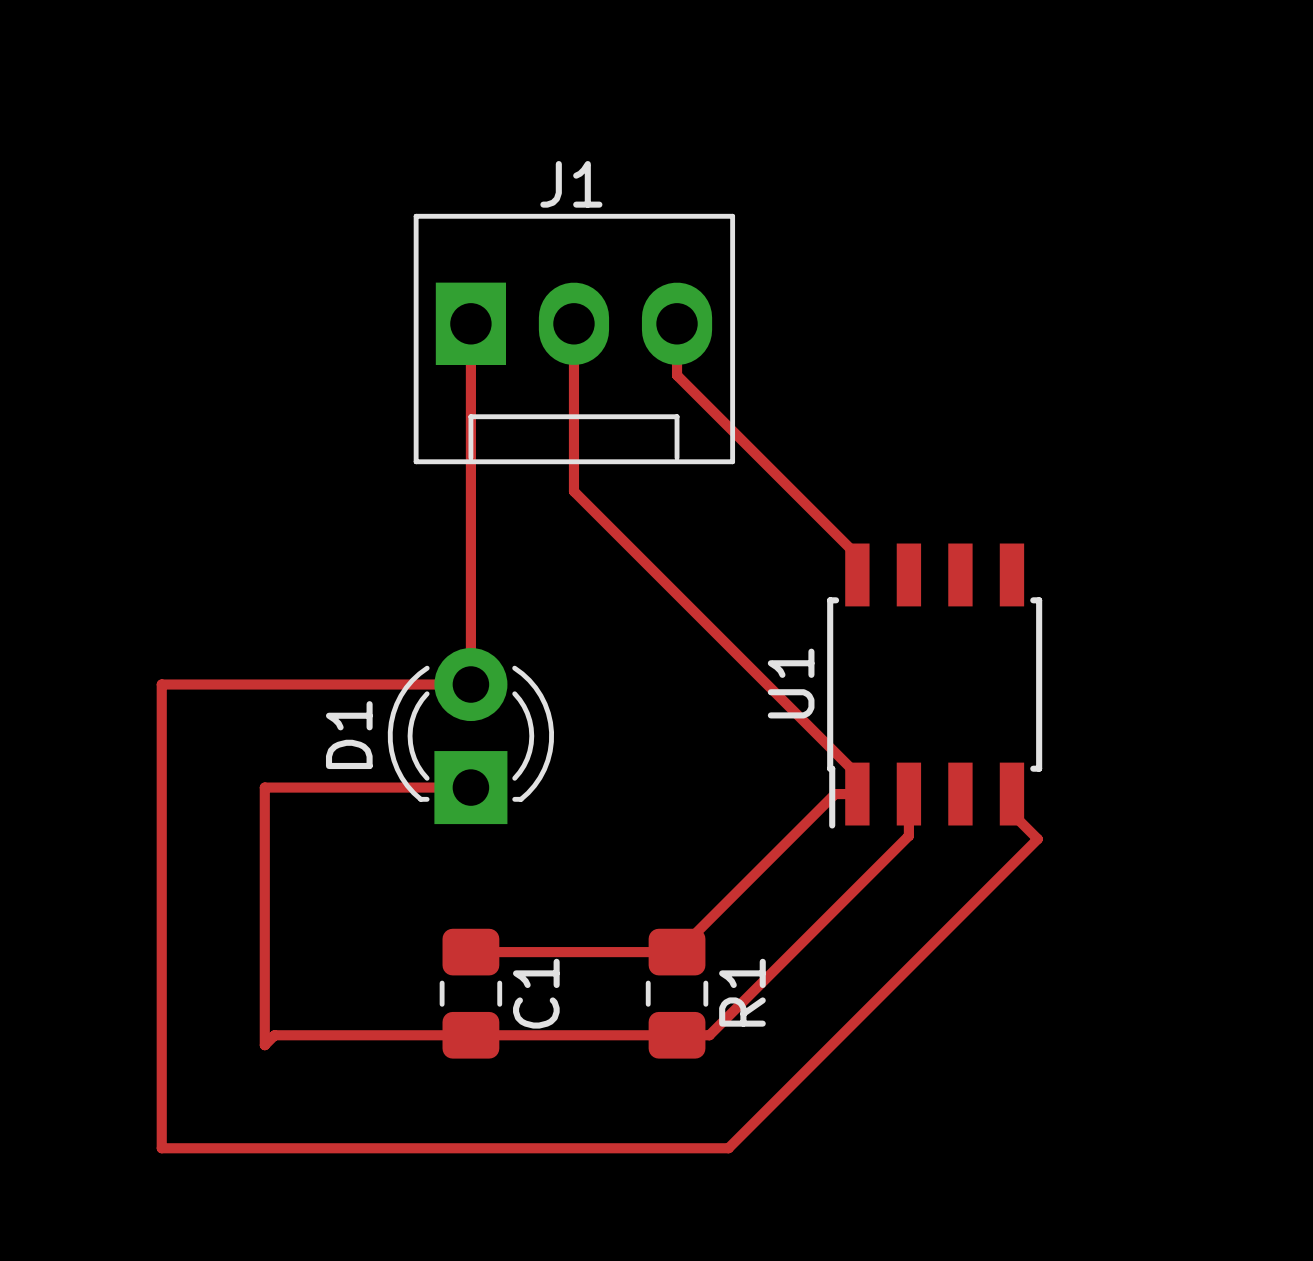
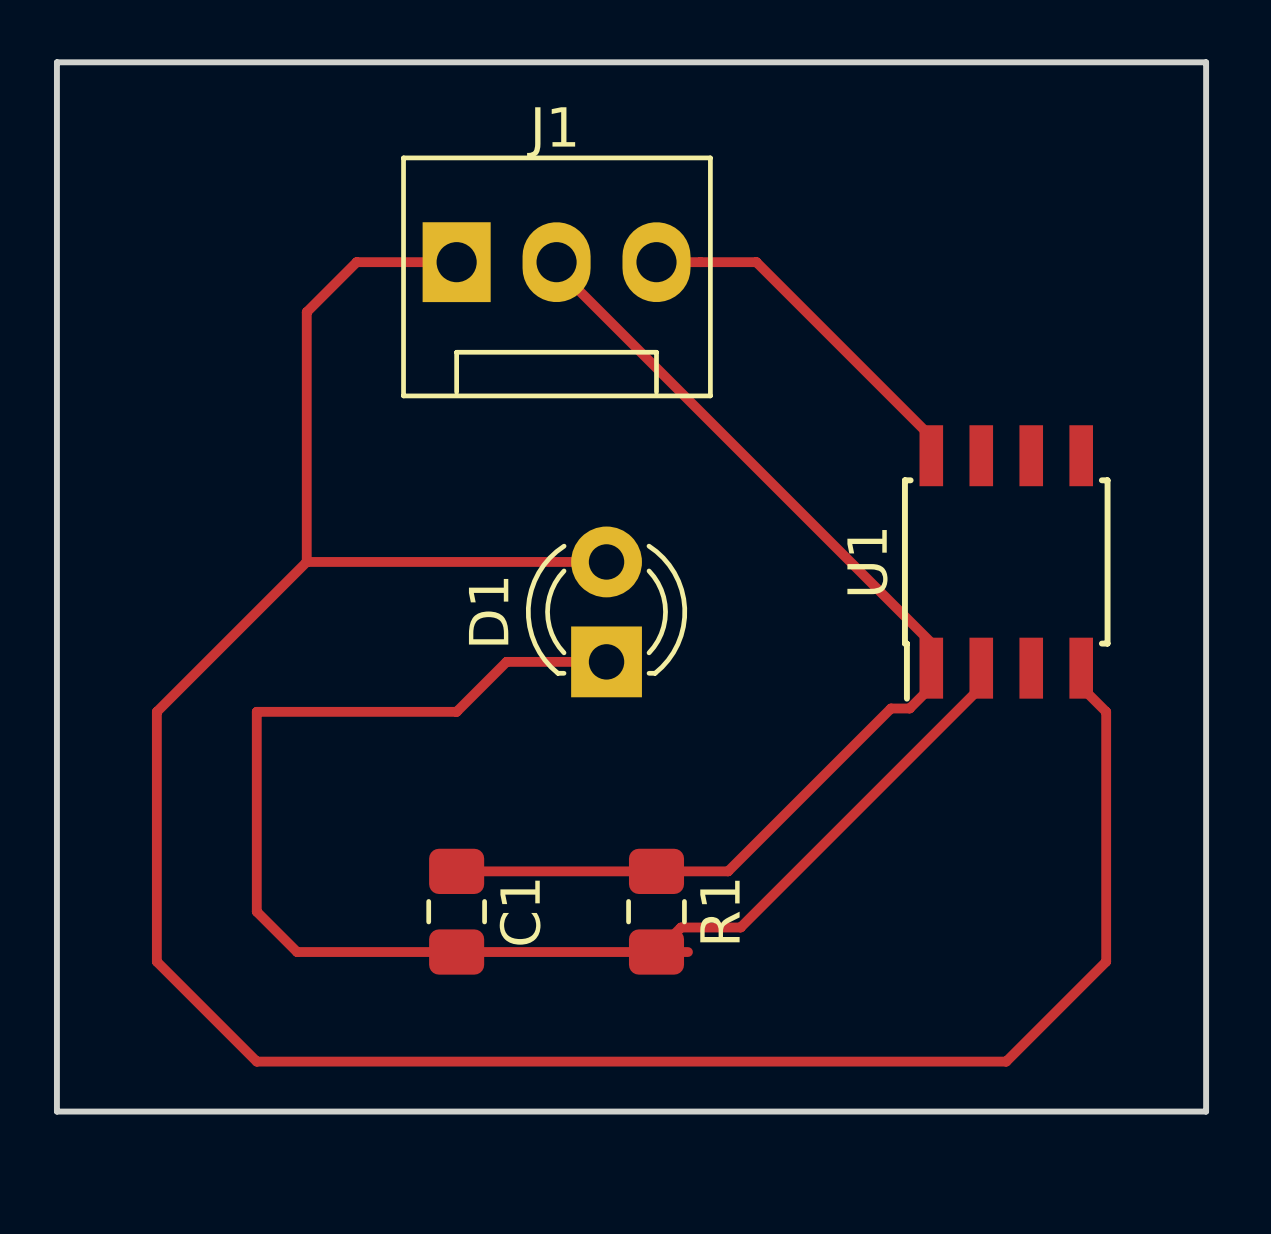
board edge: none -> (56, 62) (1206, 62) (1206, 1111) (56, 1111) (56, 62)
top track: (470, 323) (470, 684) (161, 684) (161, 787) -> (456, 262) (356, 262) (306, 312) (306, 561)
top track: (677, 323) (677, 375) (857, 555) (857, 574) -> (656, 262) (756, 262) (931, 437) (931, 455)
top track: (573, 329) (573, 491) (857, 774) (857, 794) (835, 794) (677, 952) -> (556, 268) (931, 642) (931, 686) (909, 708) (890, 708) (728, 871) (656, 871)
top track: none -> (306, 561) (606, 561)
top track: none -> (306, 561) (156, 711)
U1 position: (934, 686) -> (1006, 563)
D1 position: (470, 736) -> (606, 611)
top track: none -> (606, 661) (506, 661) (456, 711)
top track: none -> (981, 668) (981, 686) (740, 927) (681, 927) (656, 952)
top track: (908, 794) (908, 835) (709, 1035) -> none
top track: (1011, 794) (1011, 813) (1037, 839) (728, 1148) -> (1081, 668) (1081, 686) (1106, 711) (1106, 961) (1006, 1061) (706, 1061)
top track: (264, 993) (264, 1045) (274, 1035) (306, 1035) -> (256, 911) (297, 952)
top track: (161, 1045) (161, 1148) (264, 1148) -> (156, 961) (256, 1061)

